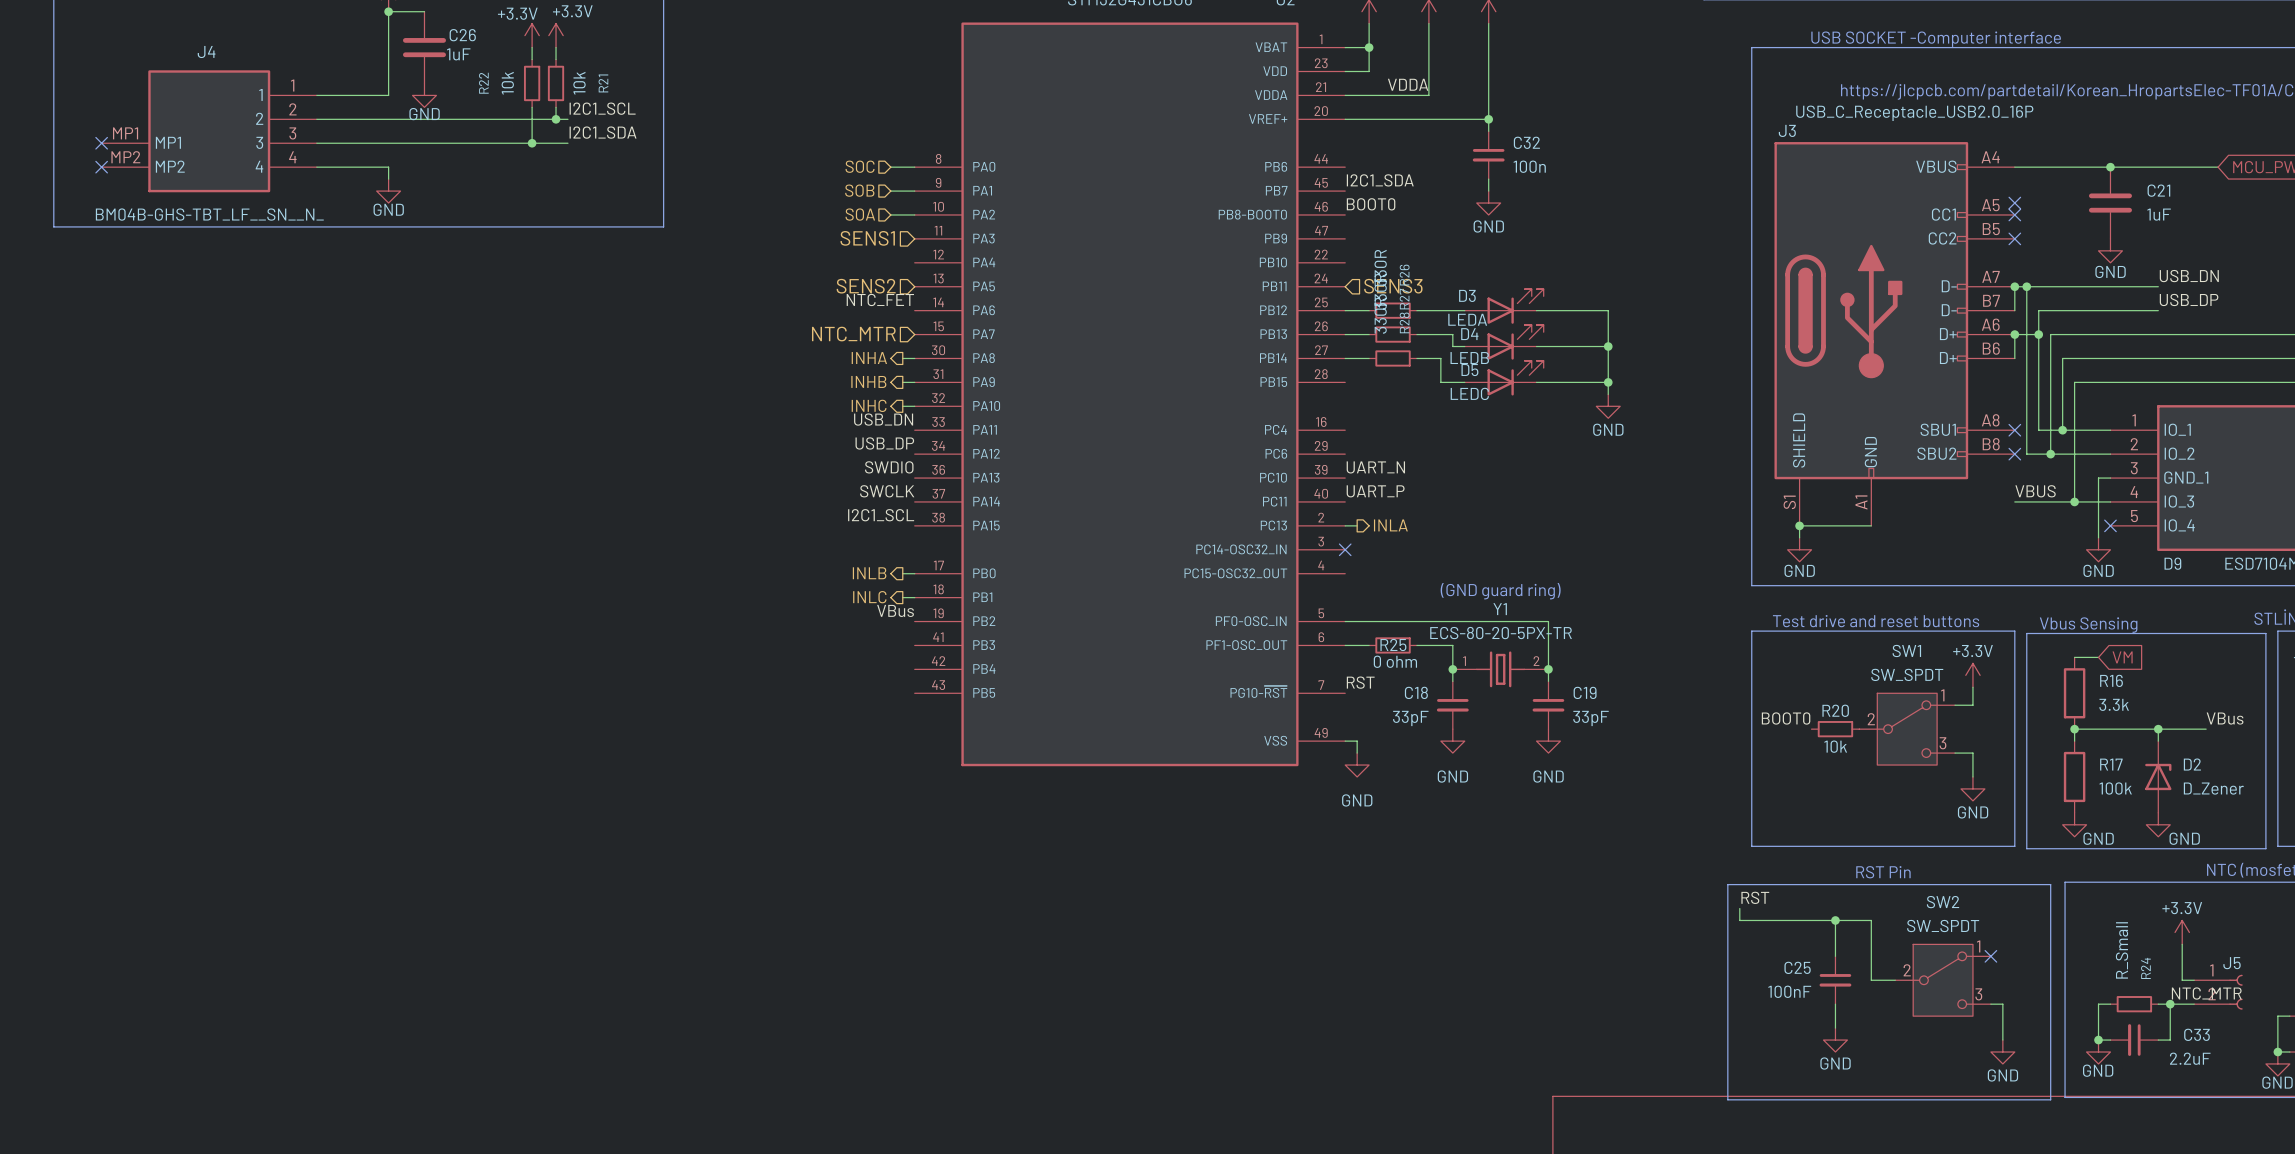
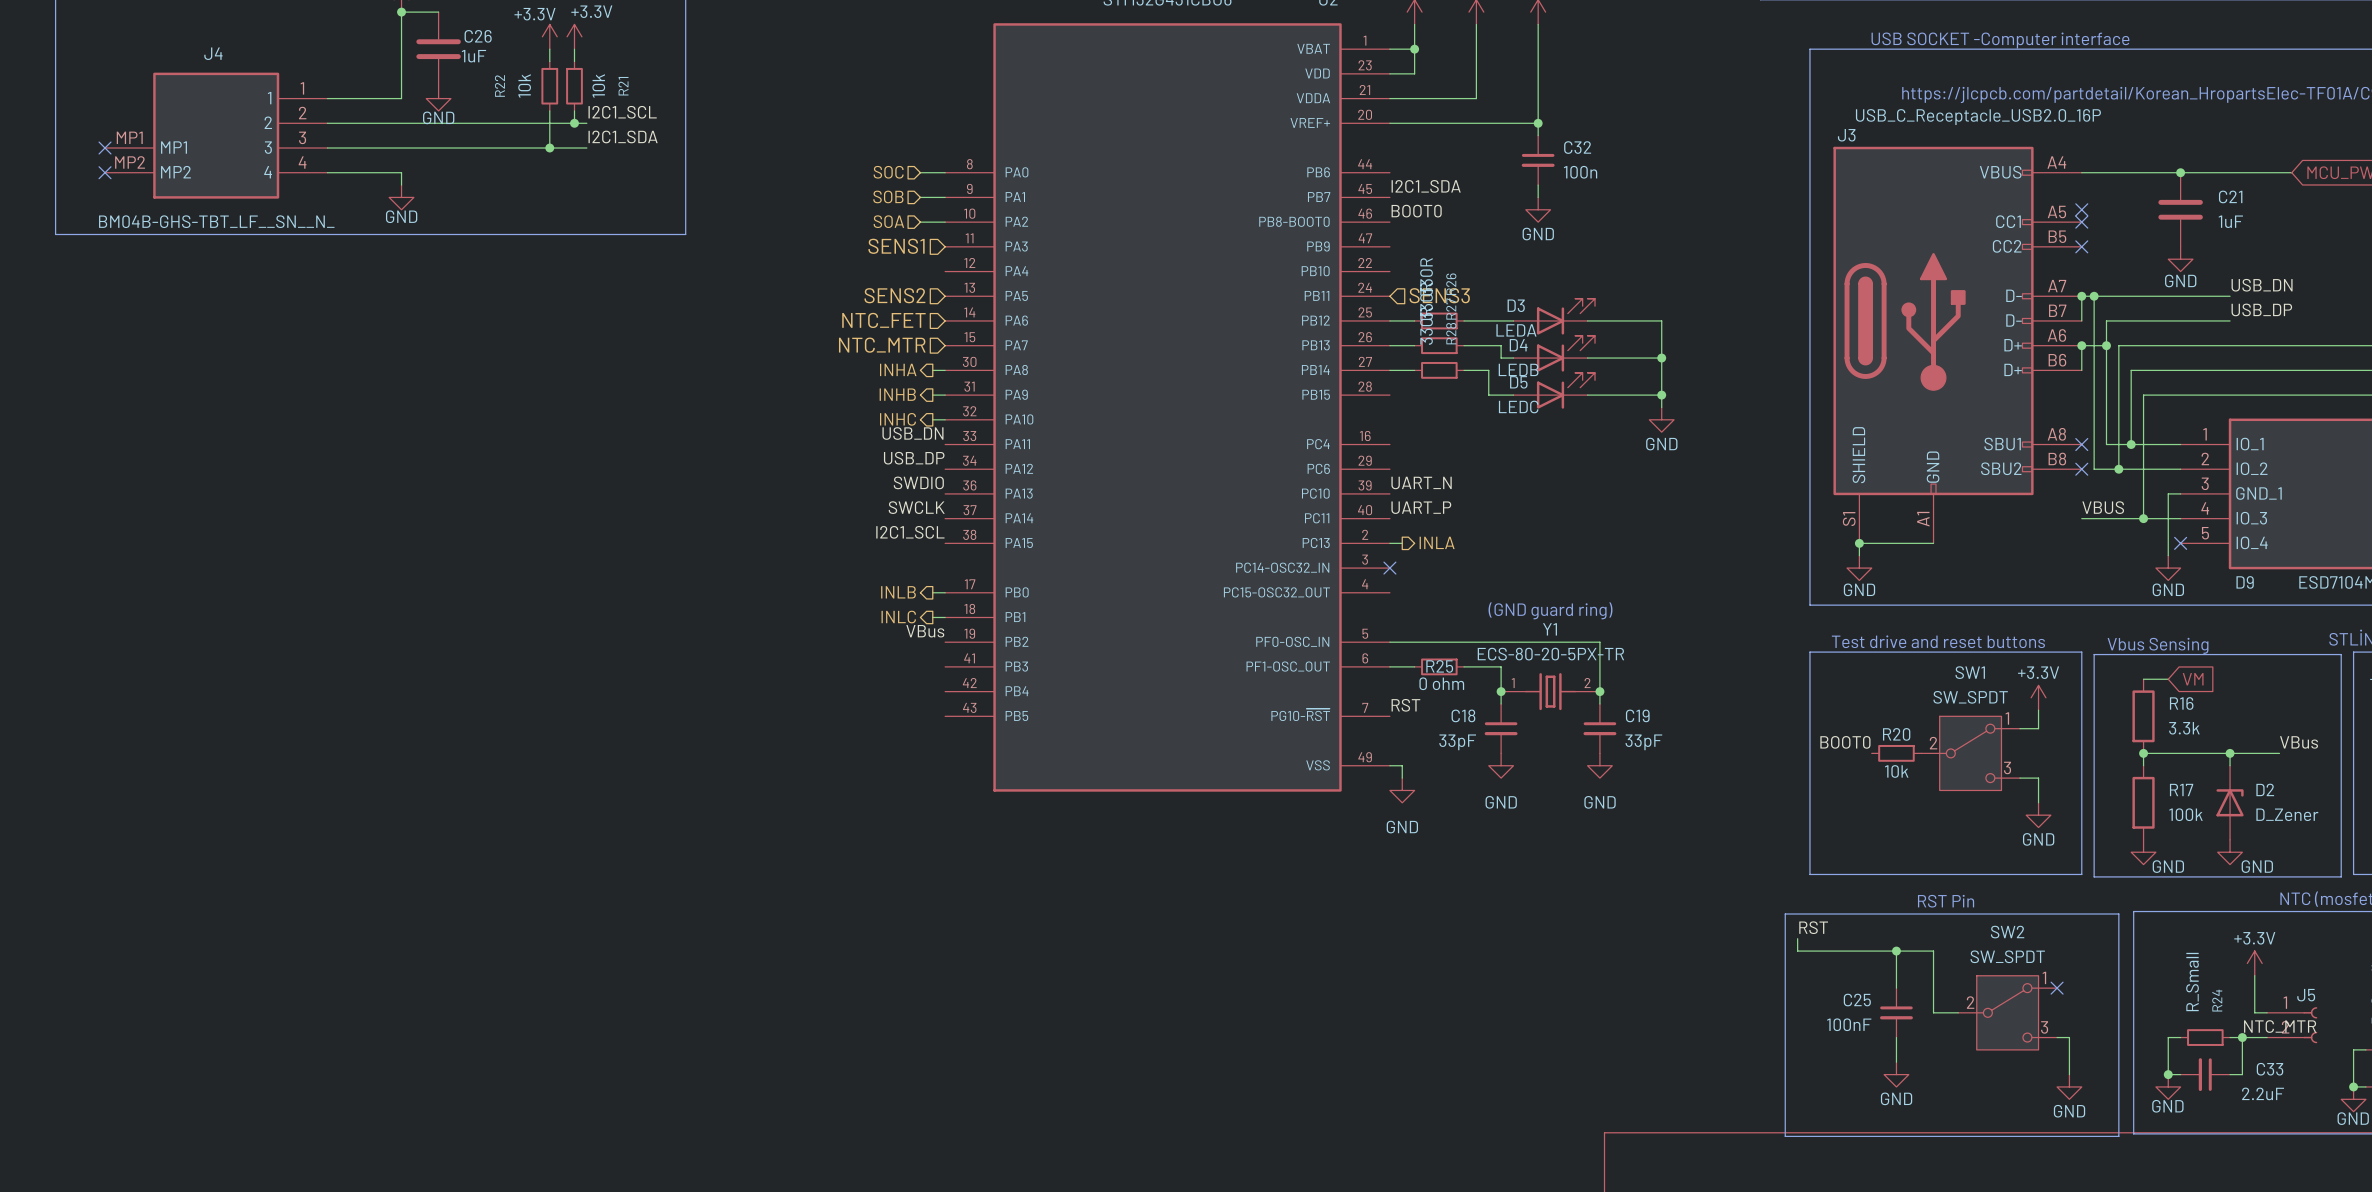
label: VDDA (1408, 84) -> none
label: NTC_FET (880, 299) -> none
hierarchical label: none -> NTC_FET (883, 320)

